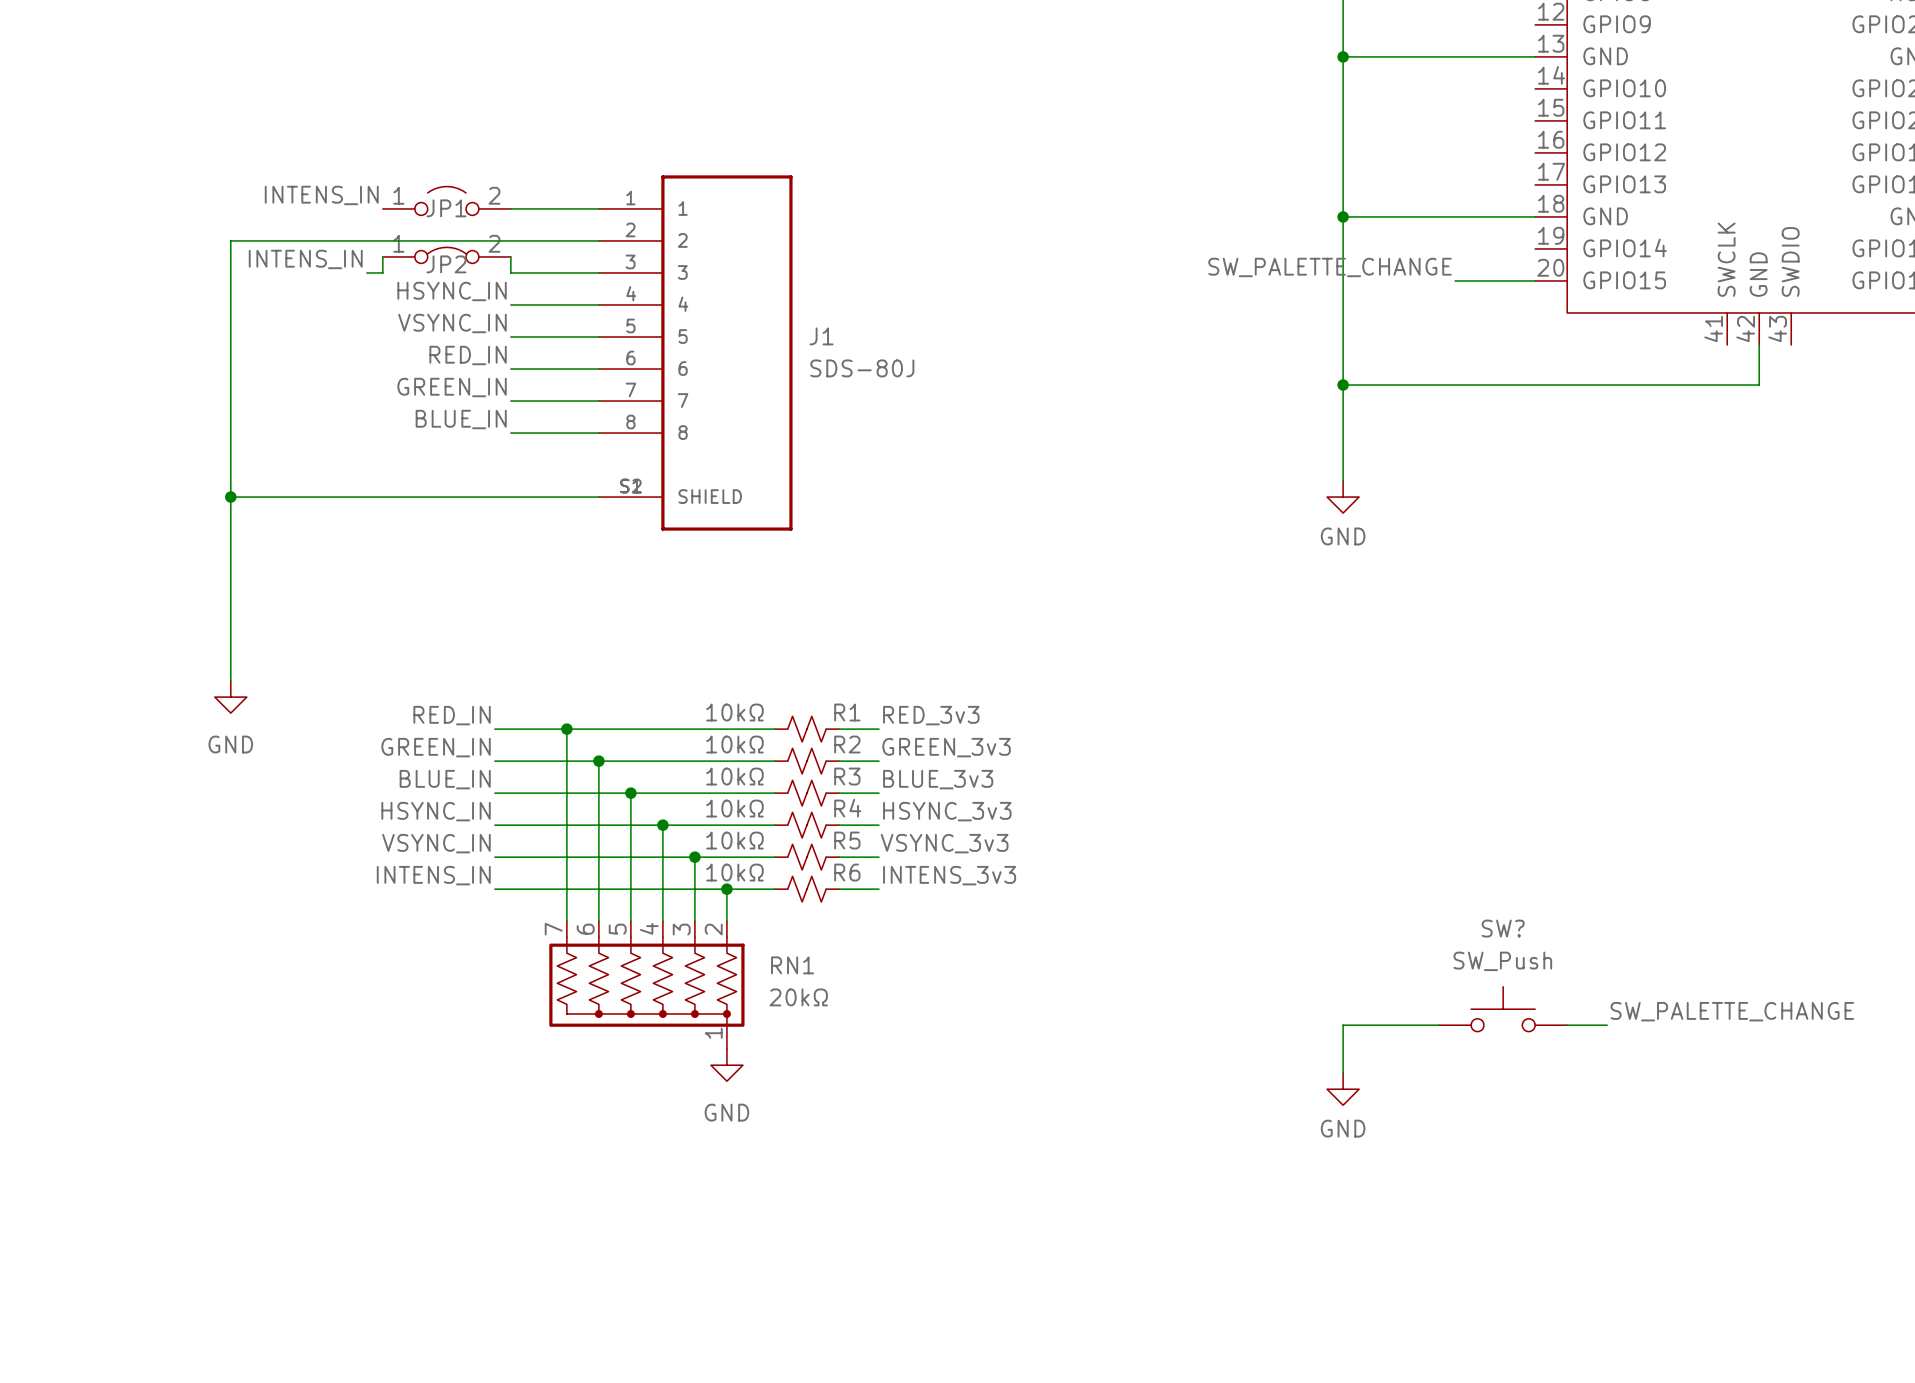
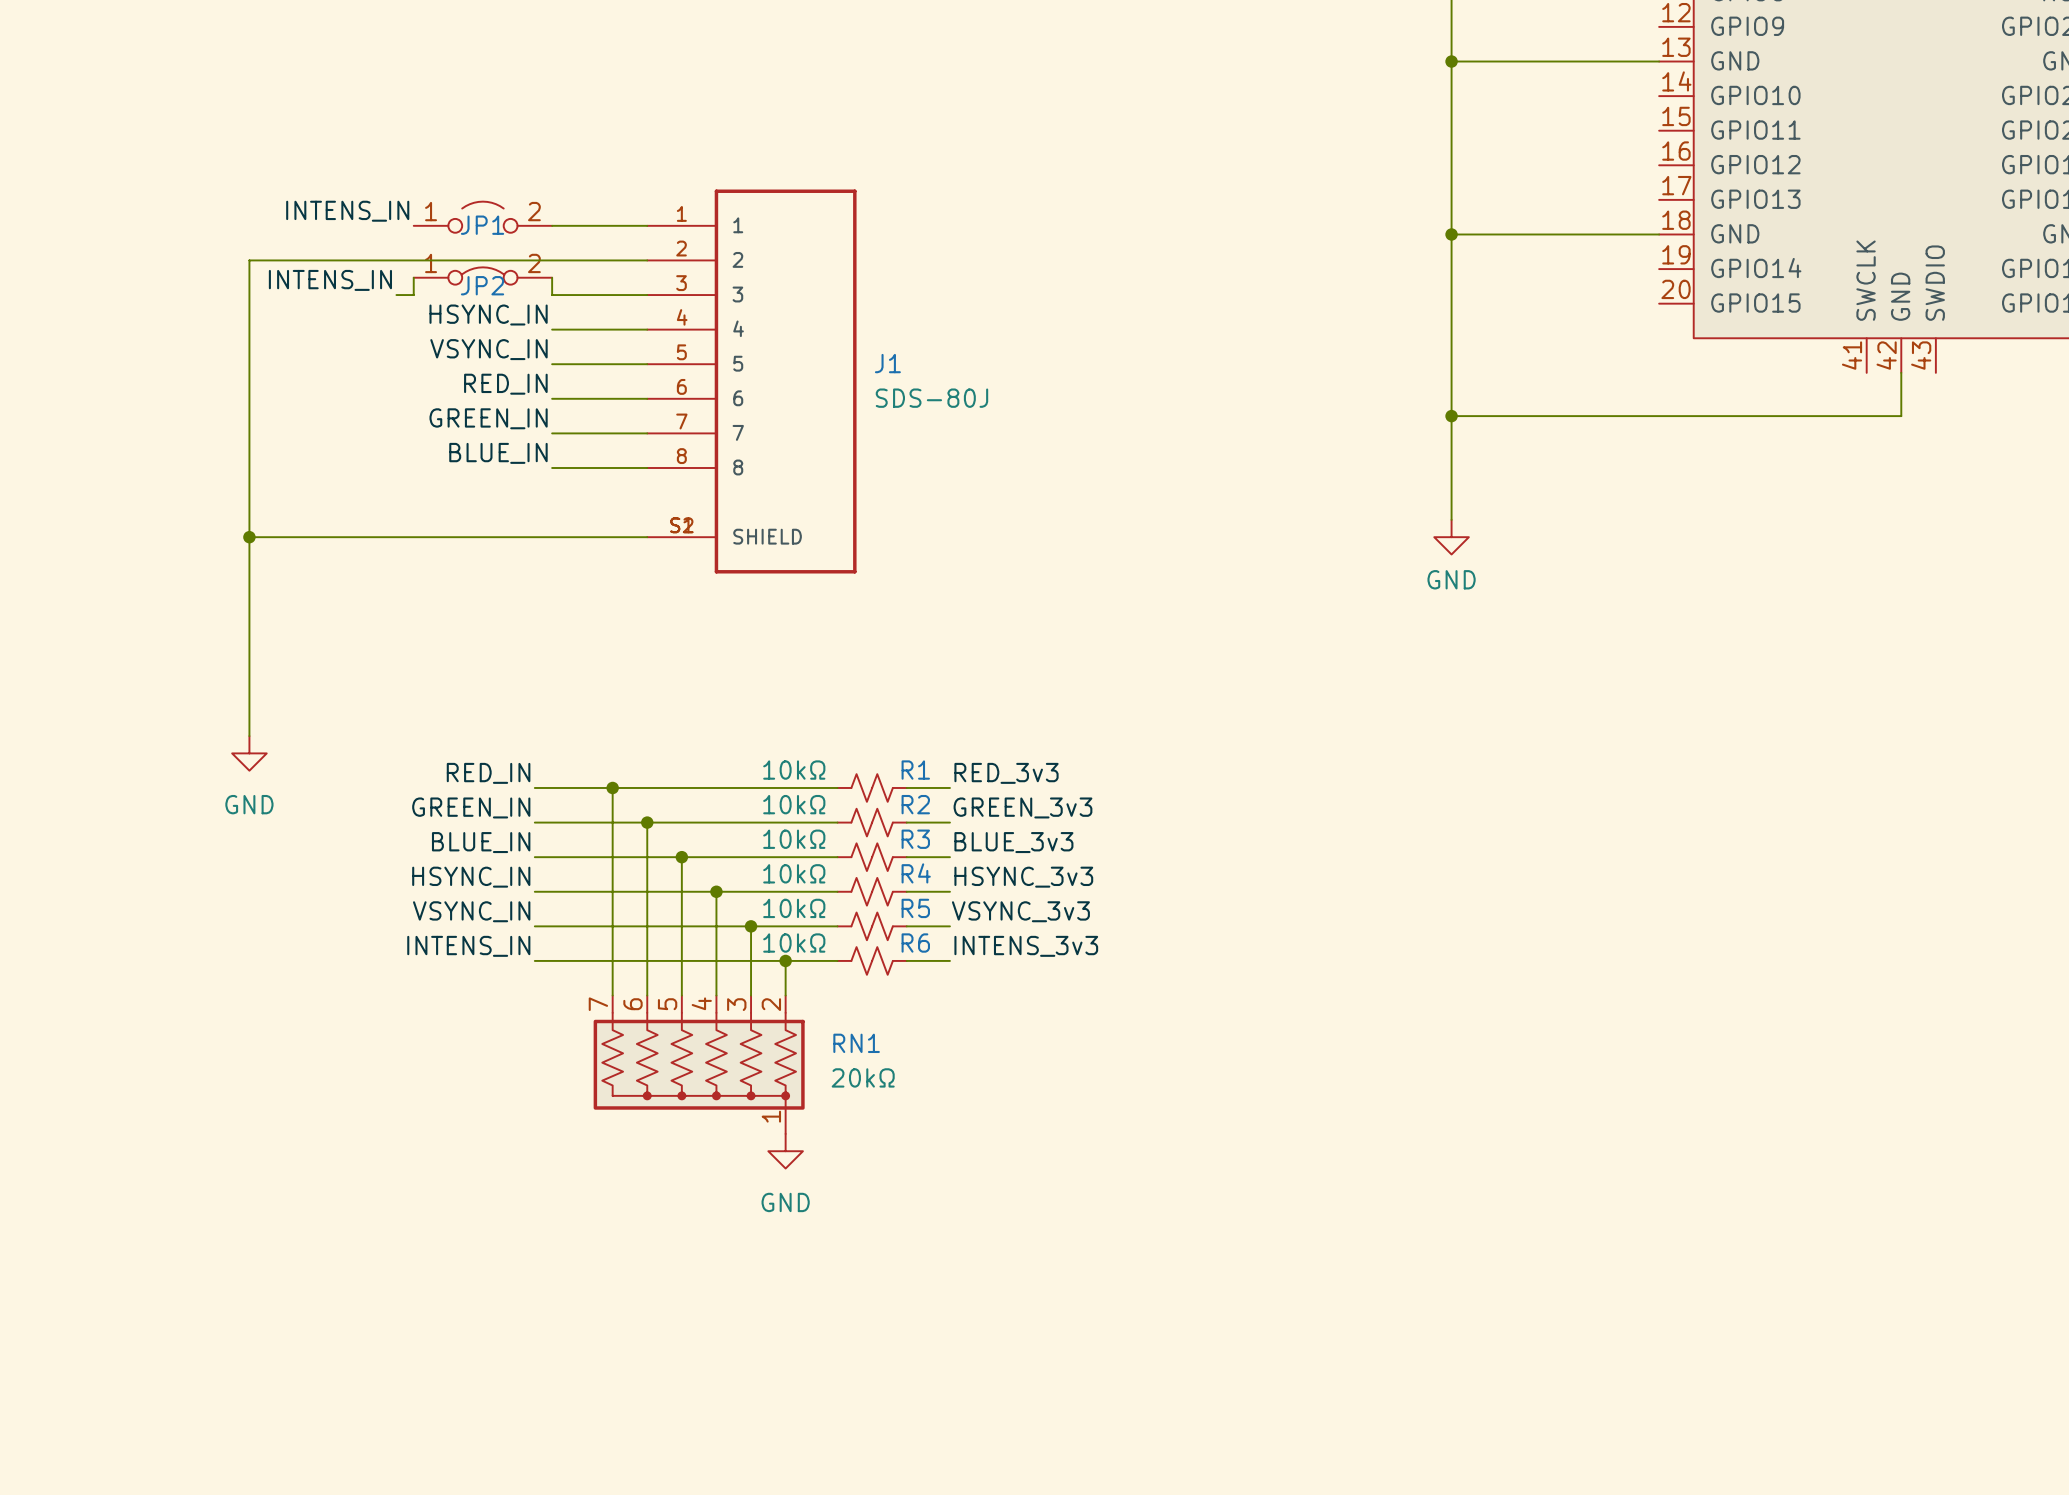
label: SW_PALETTE_CHANGE (1330, 267) -> none
wire: (1455, 280) (1535, 280) -> none
SW?: SW_Push (1503, 1009) -> none
label: SW_PALETTE_CHANGE (1732, 1011) -> none
wire: (1439, 1025) (1343, 1025) (1343, 1073) -> none
wire: (1567, 1025) (1607, 1025) -> none
power symbol: GND (1343, 1089) -> none

